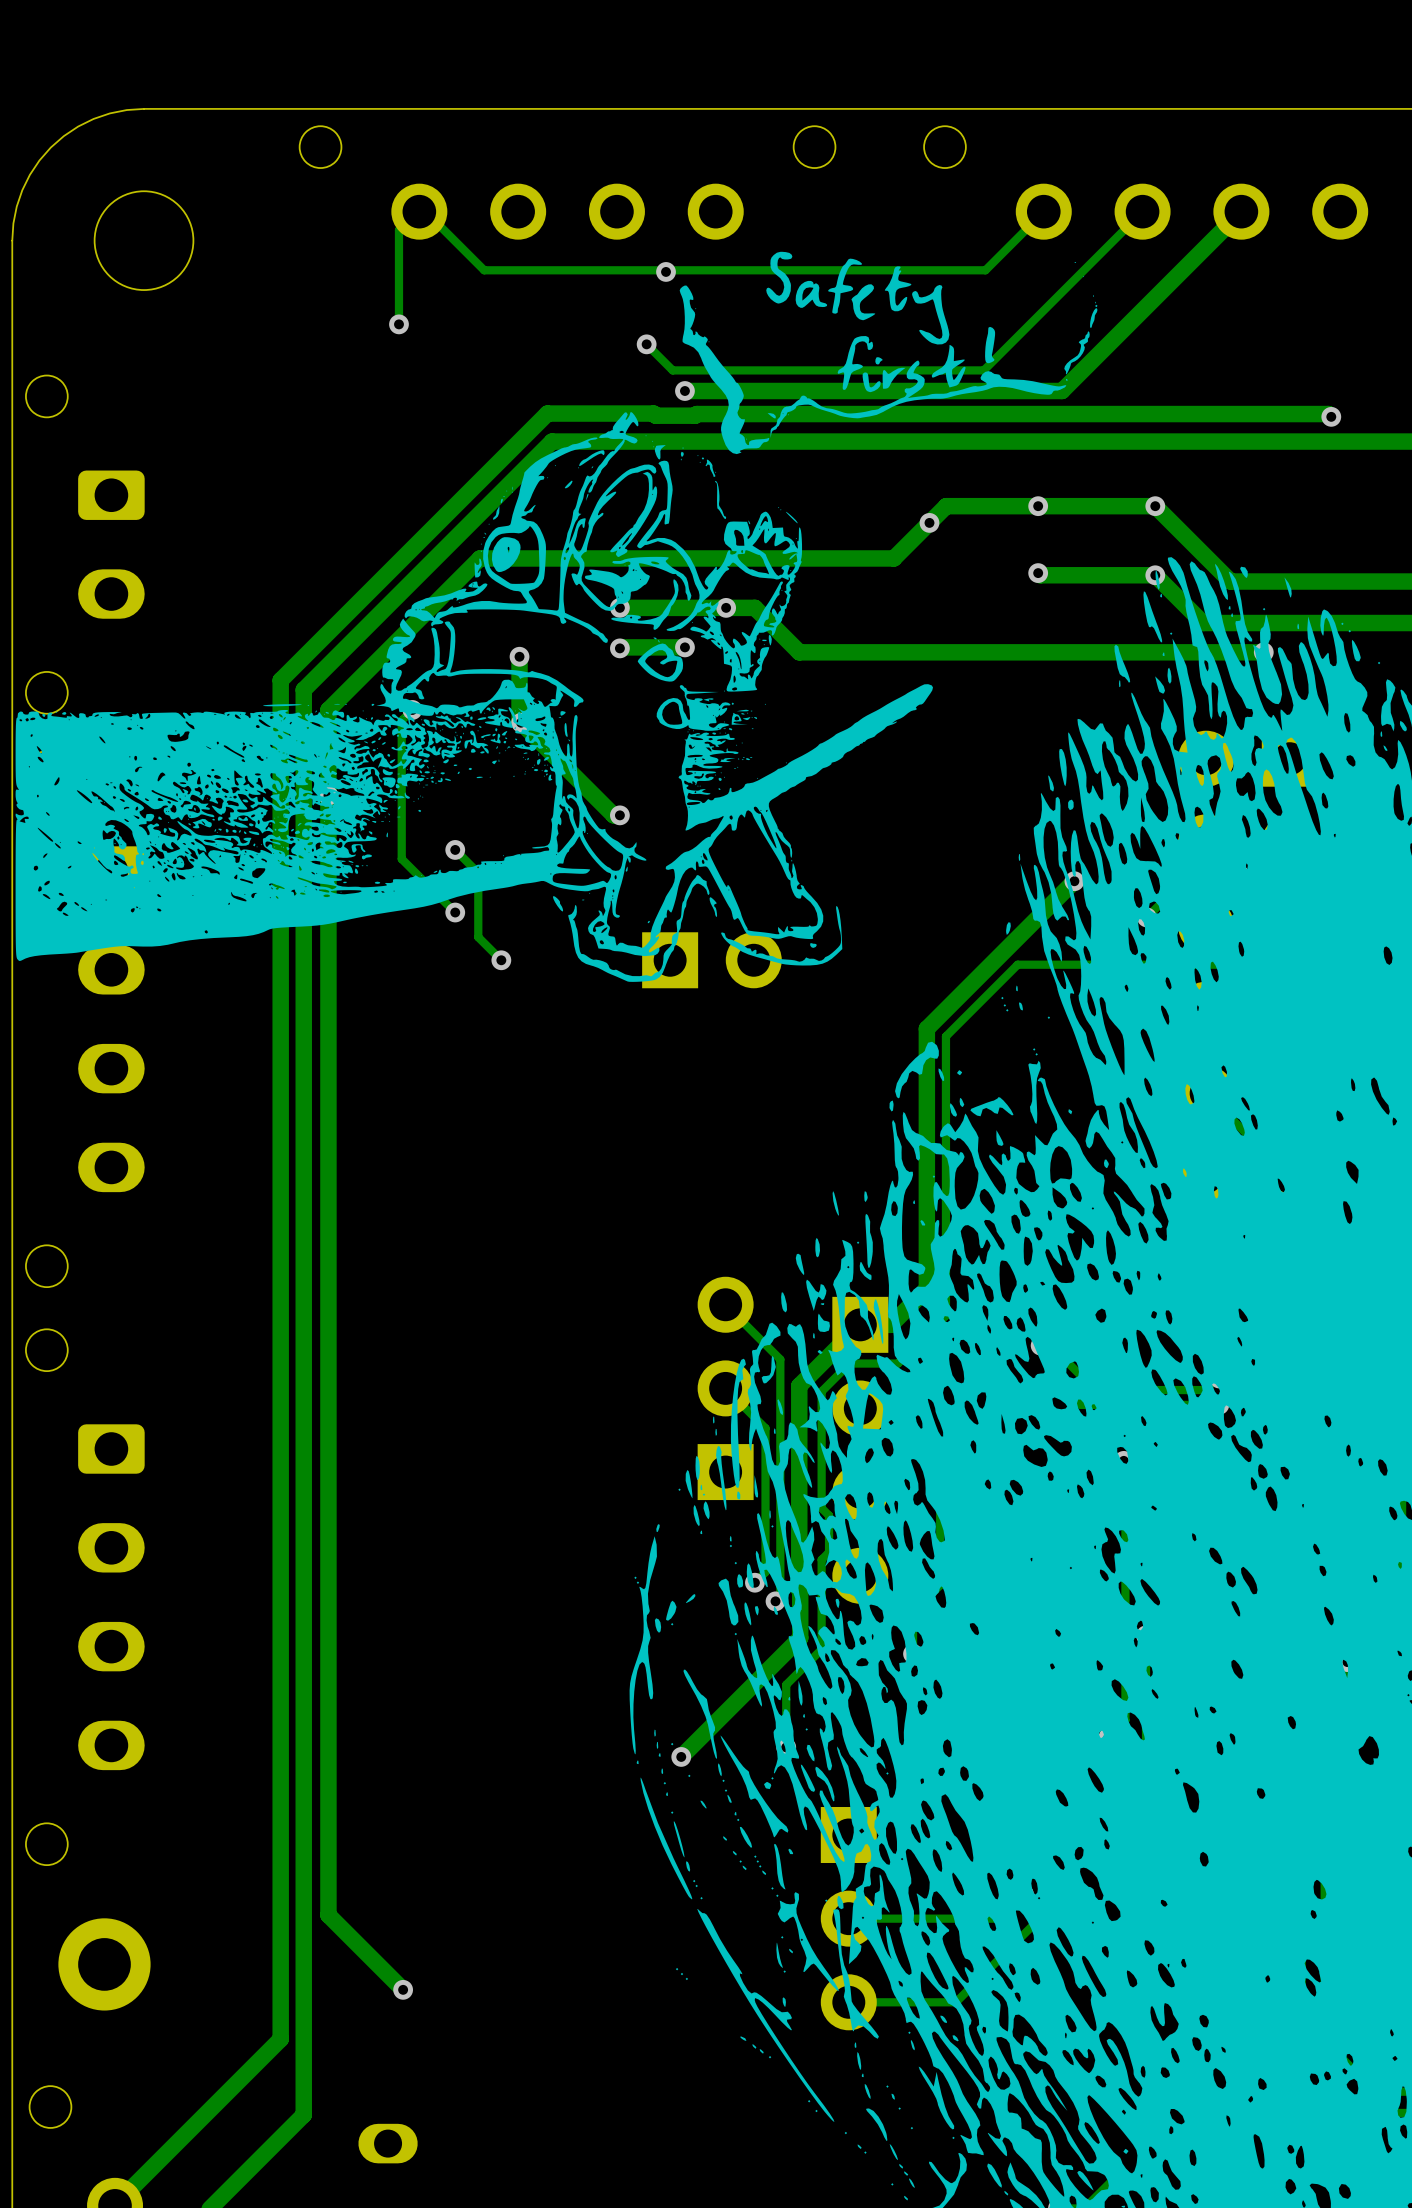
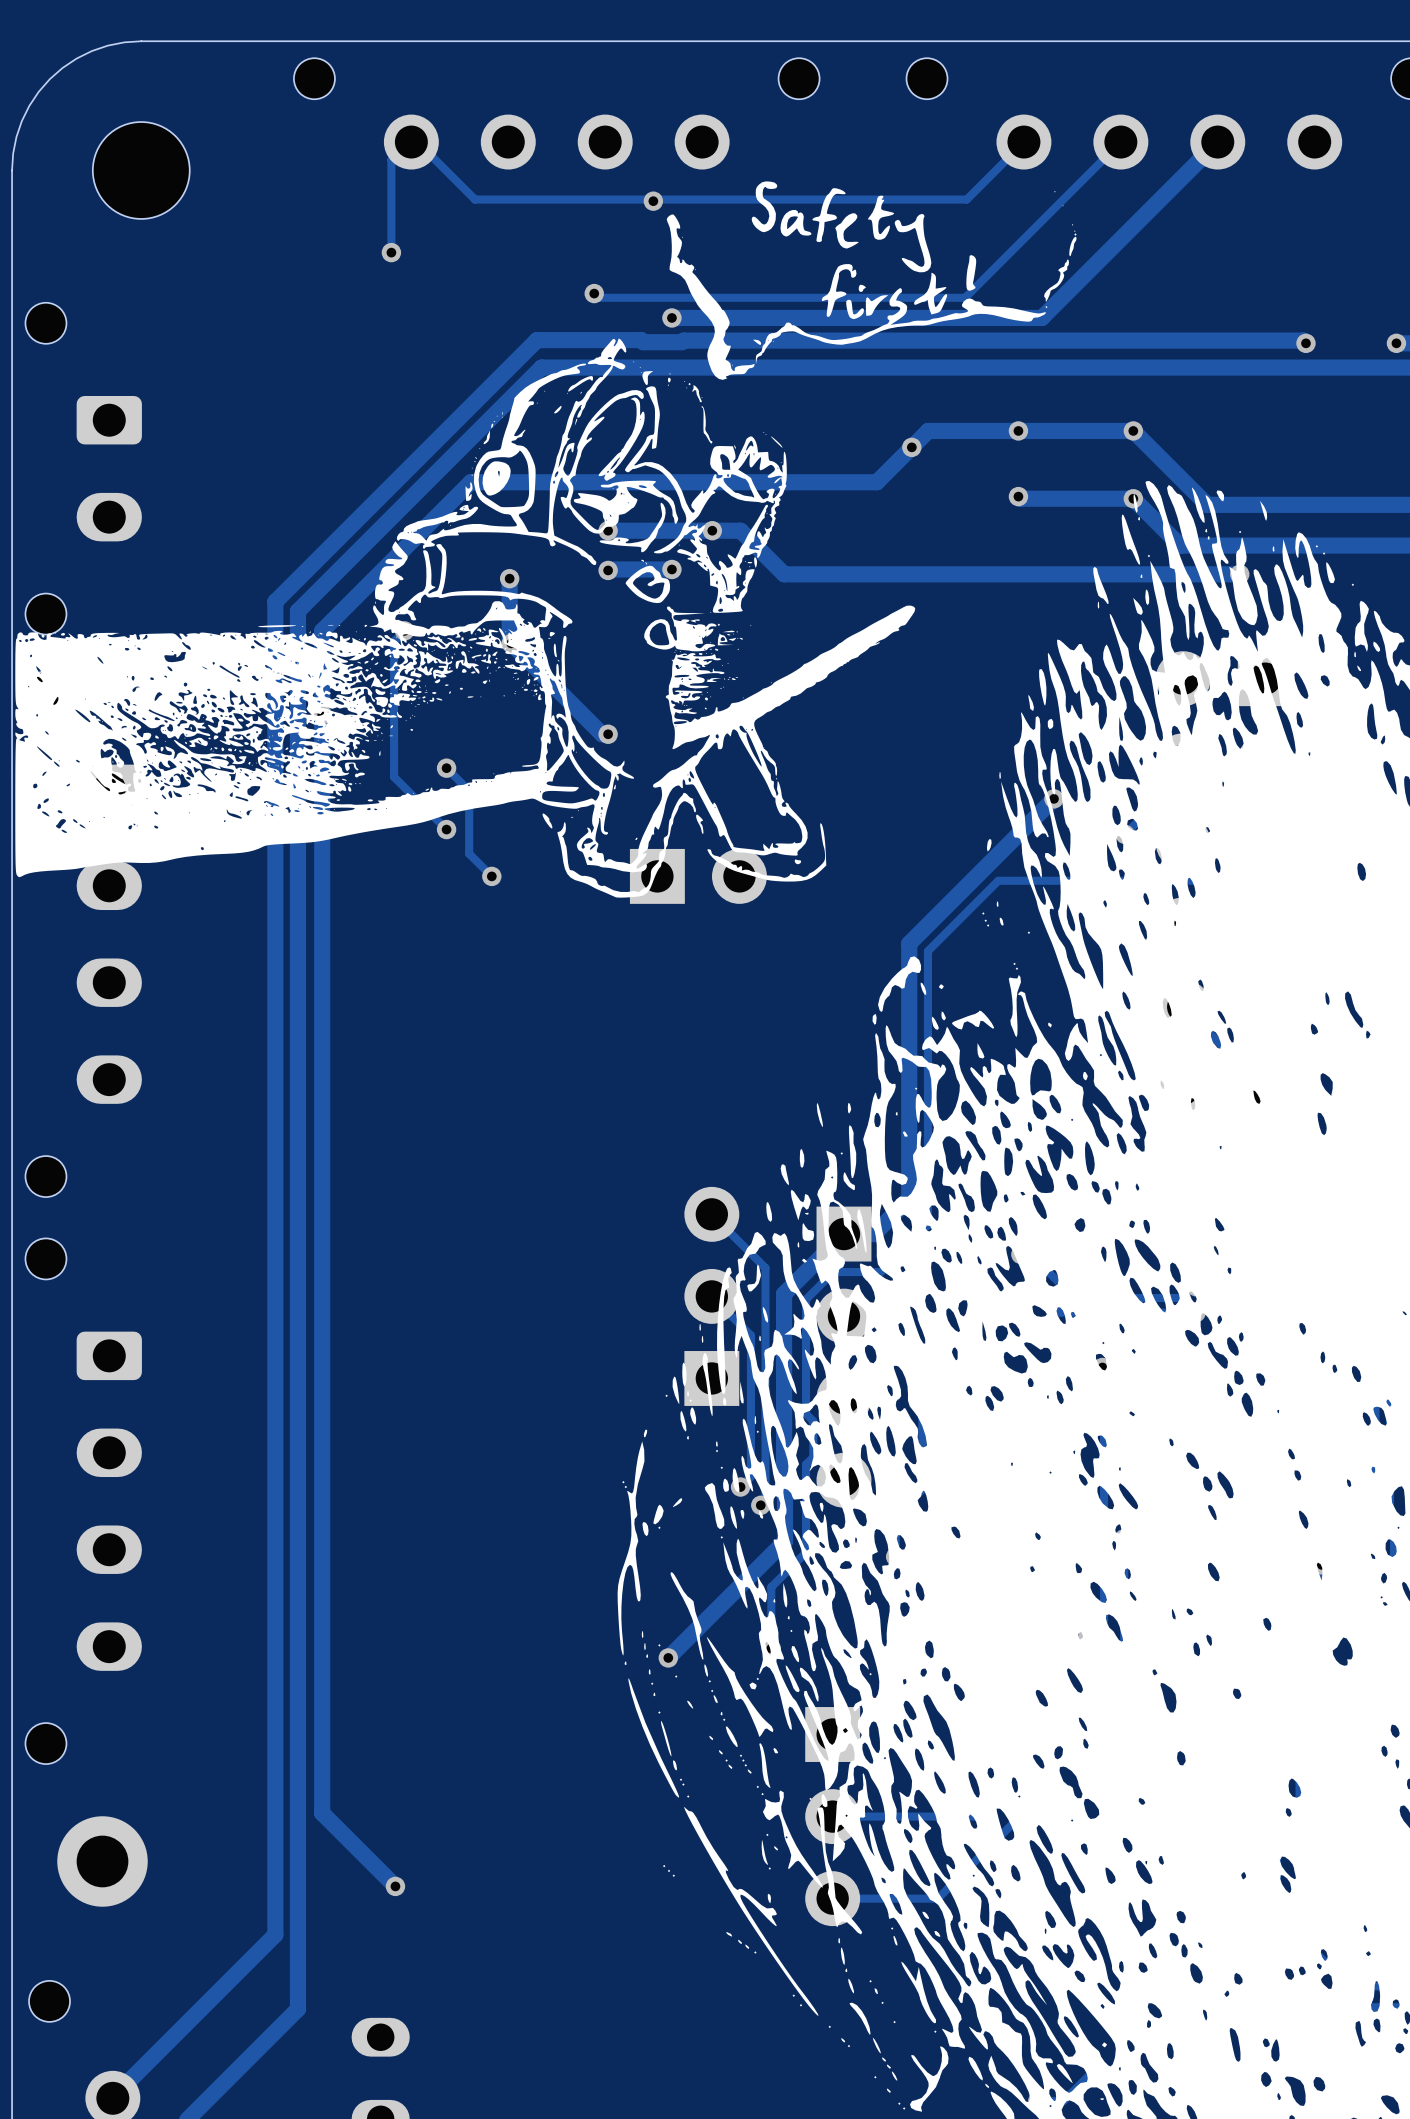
track: (646, 344) (672, 370) -> (594, 293) (598, 297) (659, 297)
via position: (646, 344) -> (594, 293)

